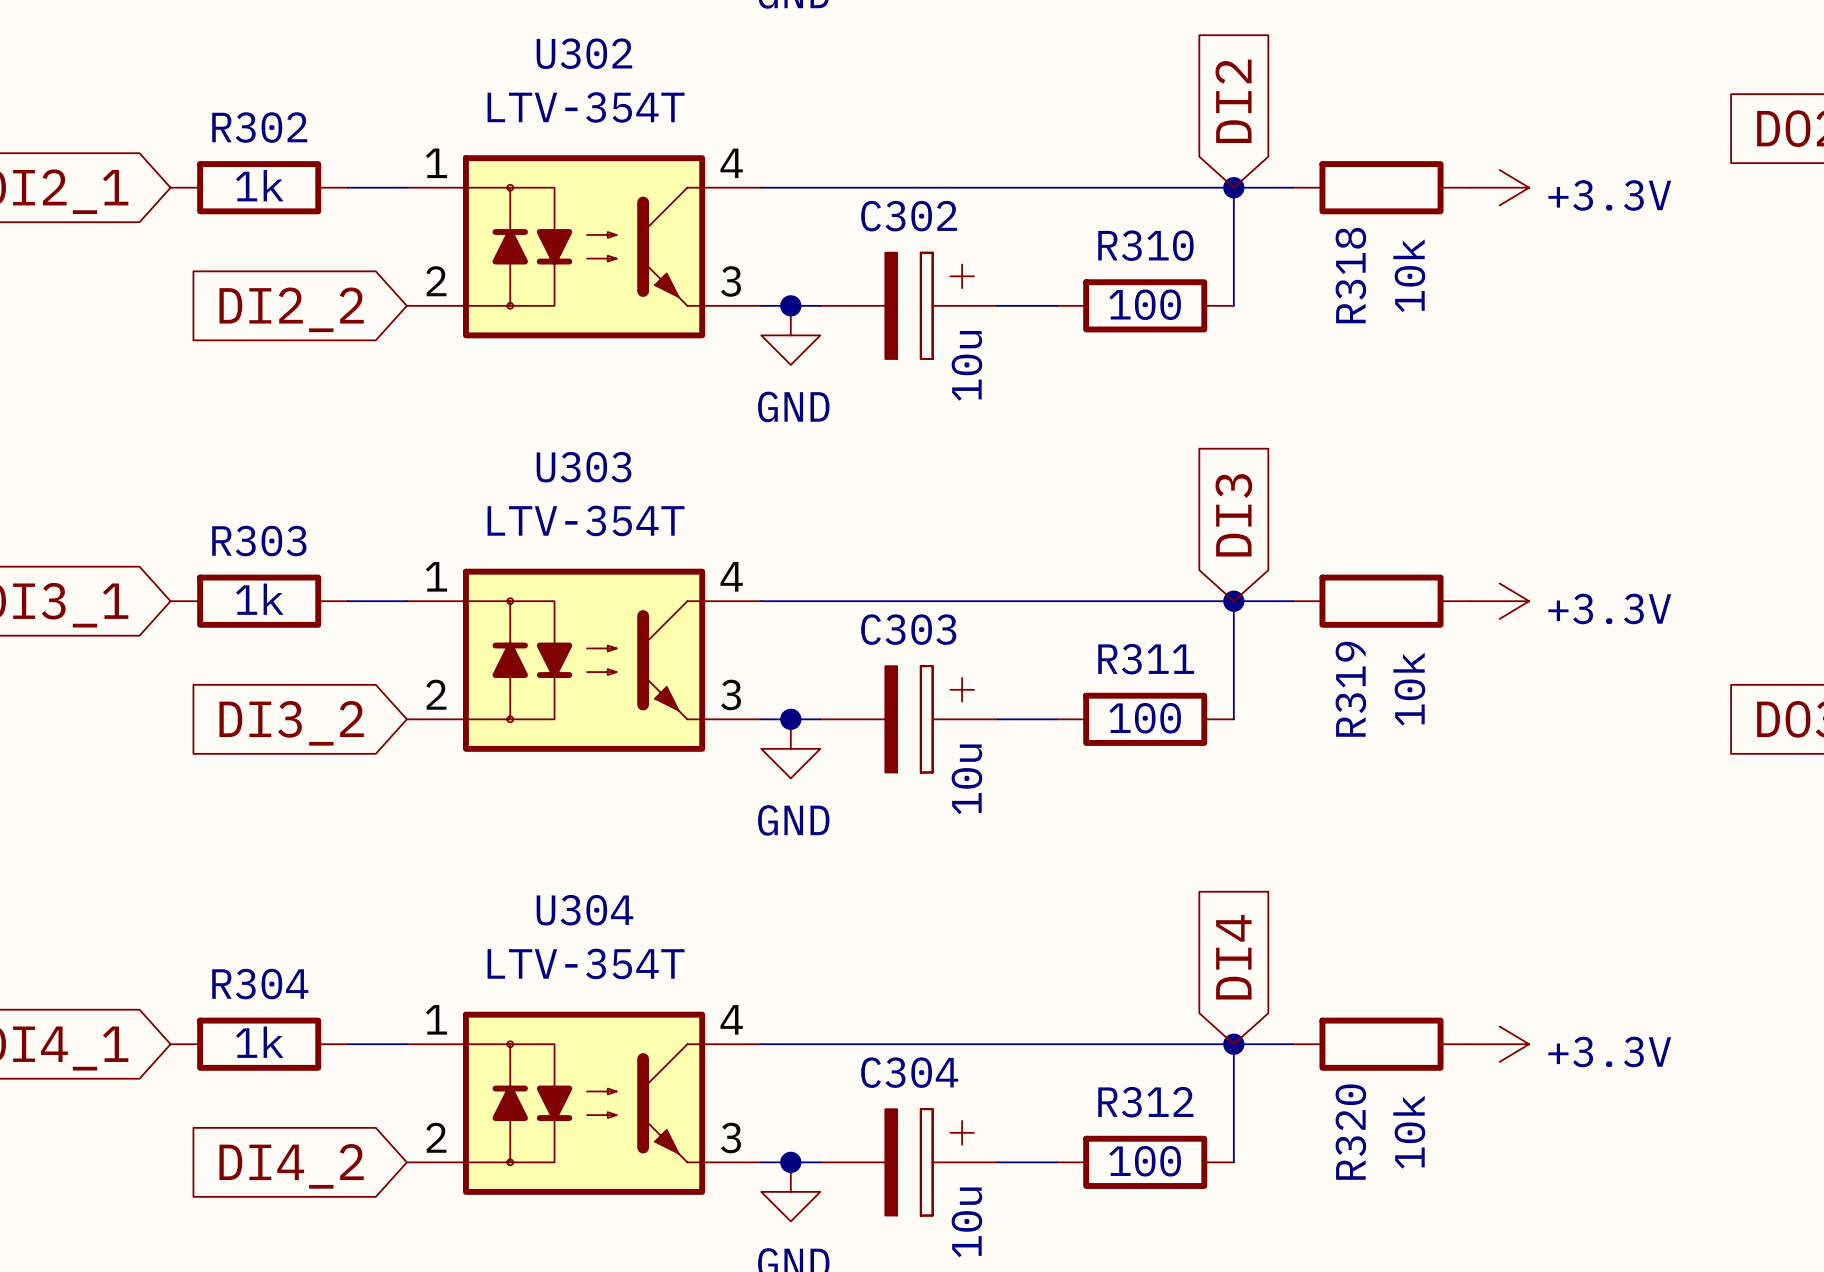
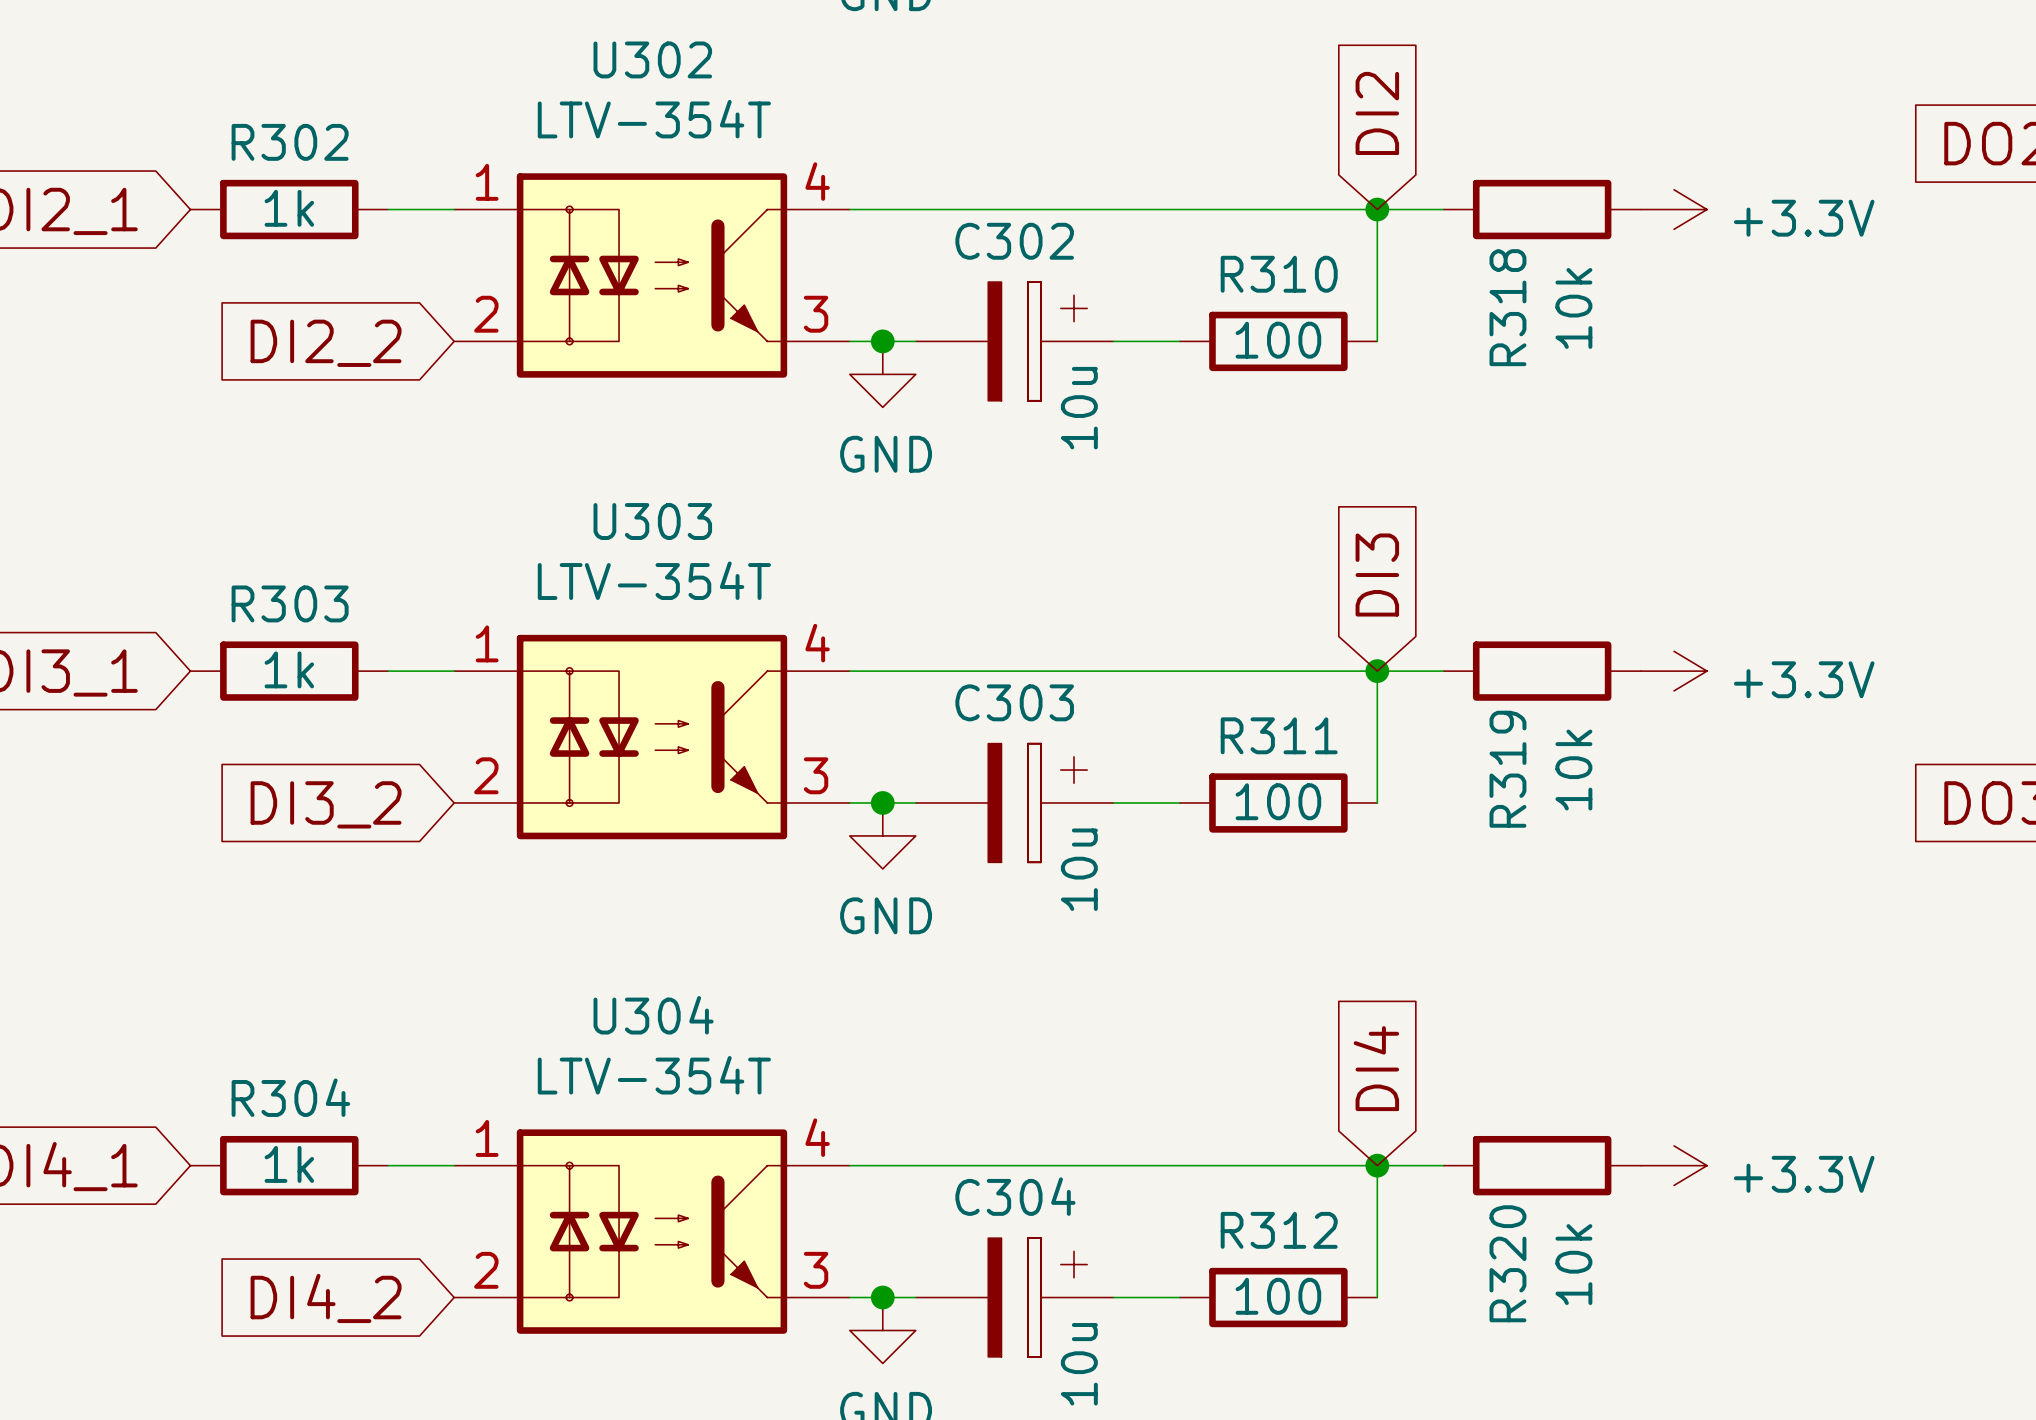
U302 symbol: [406, 155, 762, 339] -> [454, 173, 850, 378]
U303 symbol: [406, 568, 762, 752] -> [454, 634, 850, 840]
U304 symbol: [406, 1011, 762, 1195] -> [454, 1129, 850, 1334]

